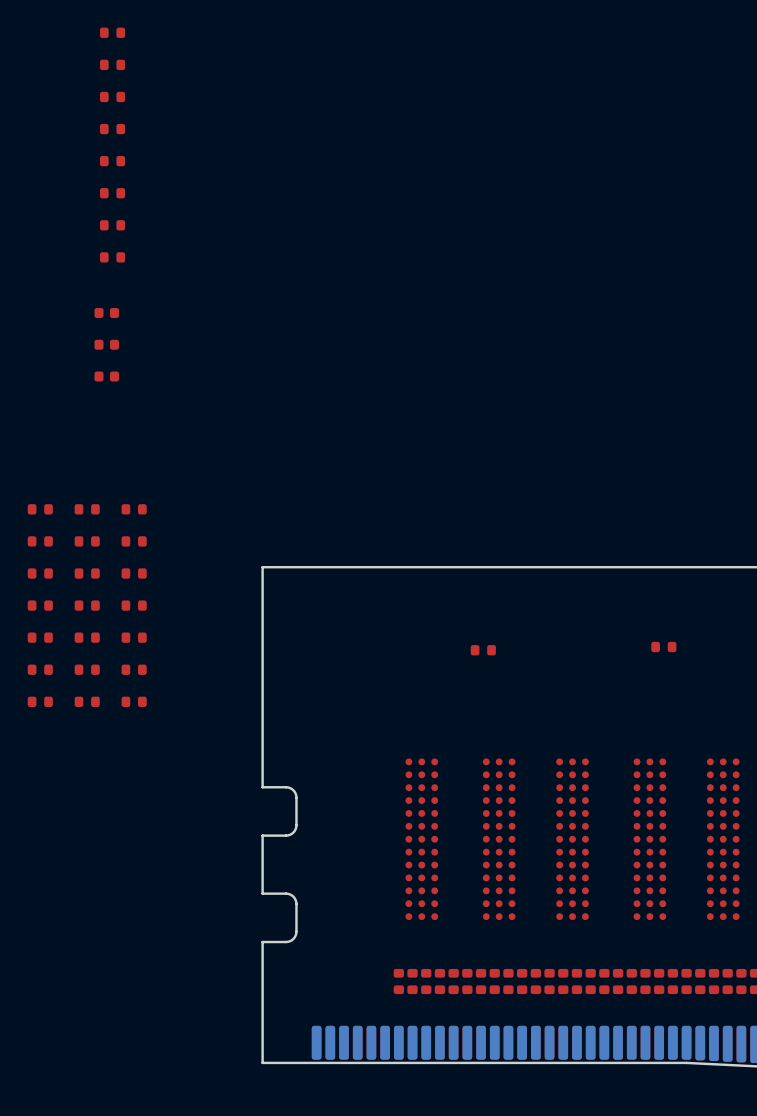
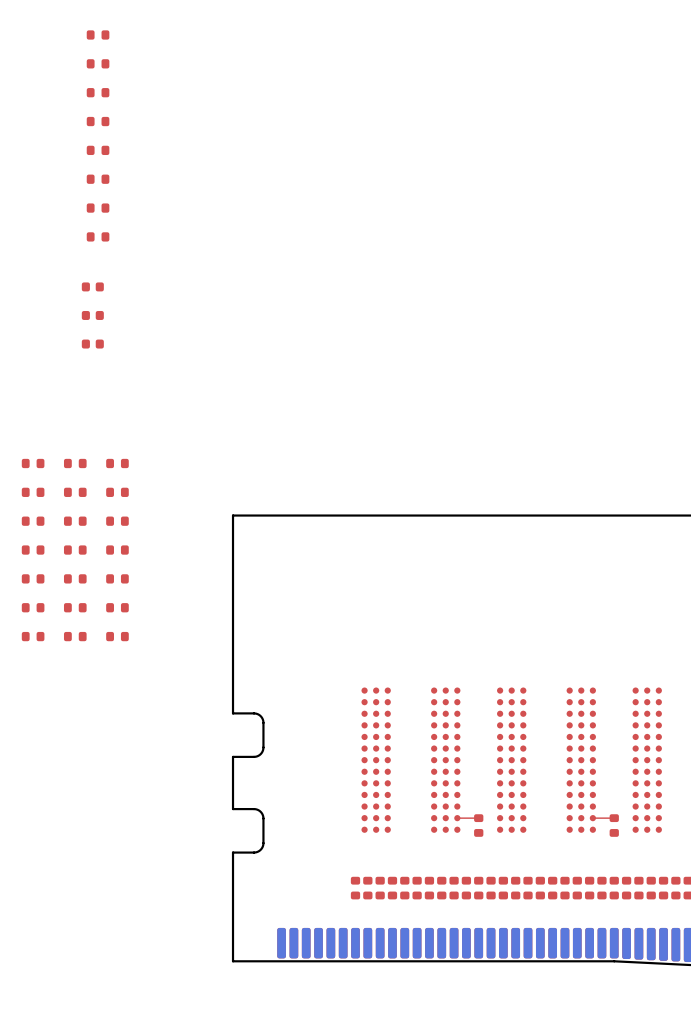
part: (663, 647) -> none
part: (483, 650) -> none
top track: none -> (457, 818) (478, 818)
top track: none -> (592, 818) (614, 818)
part: none -> (478, 825)
part: none -> (614, 825)

